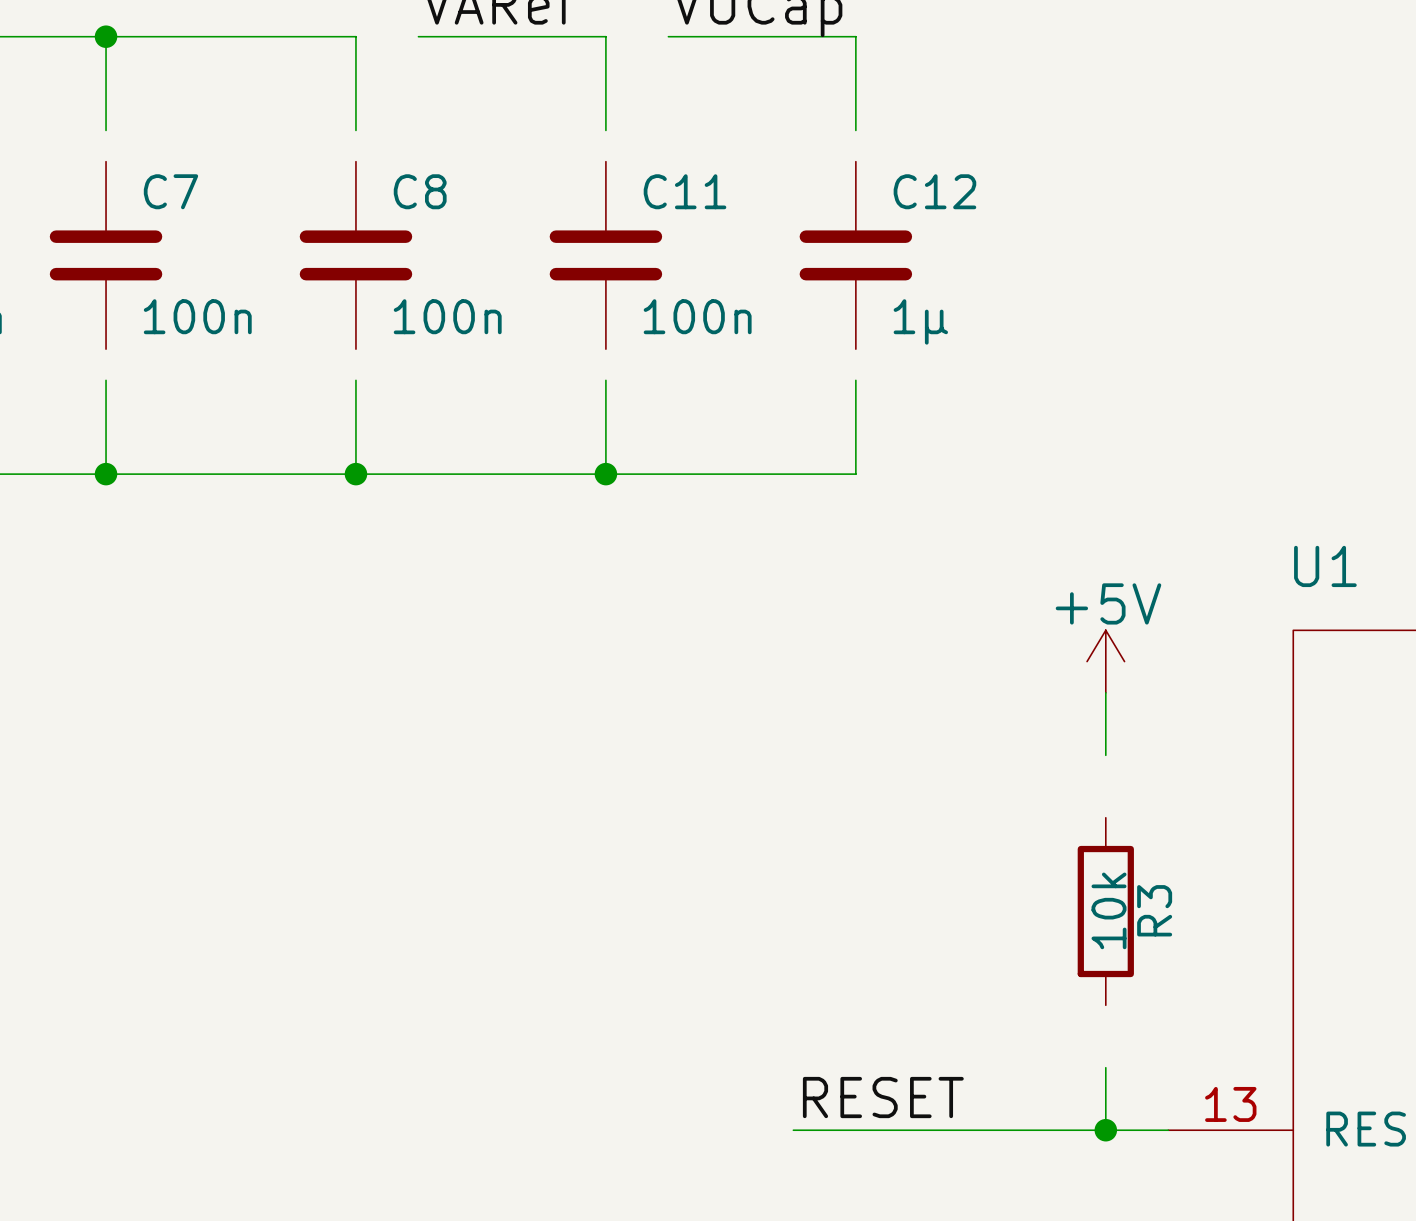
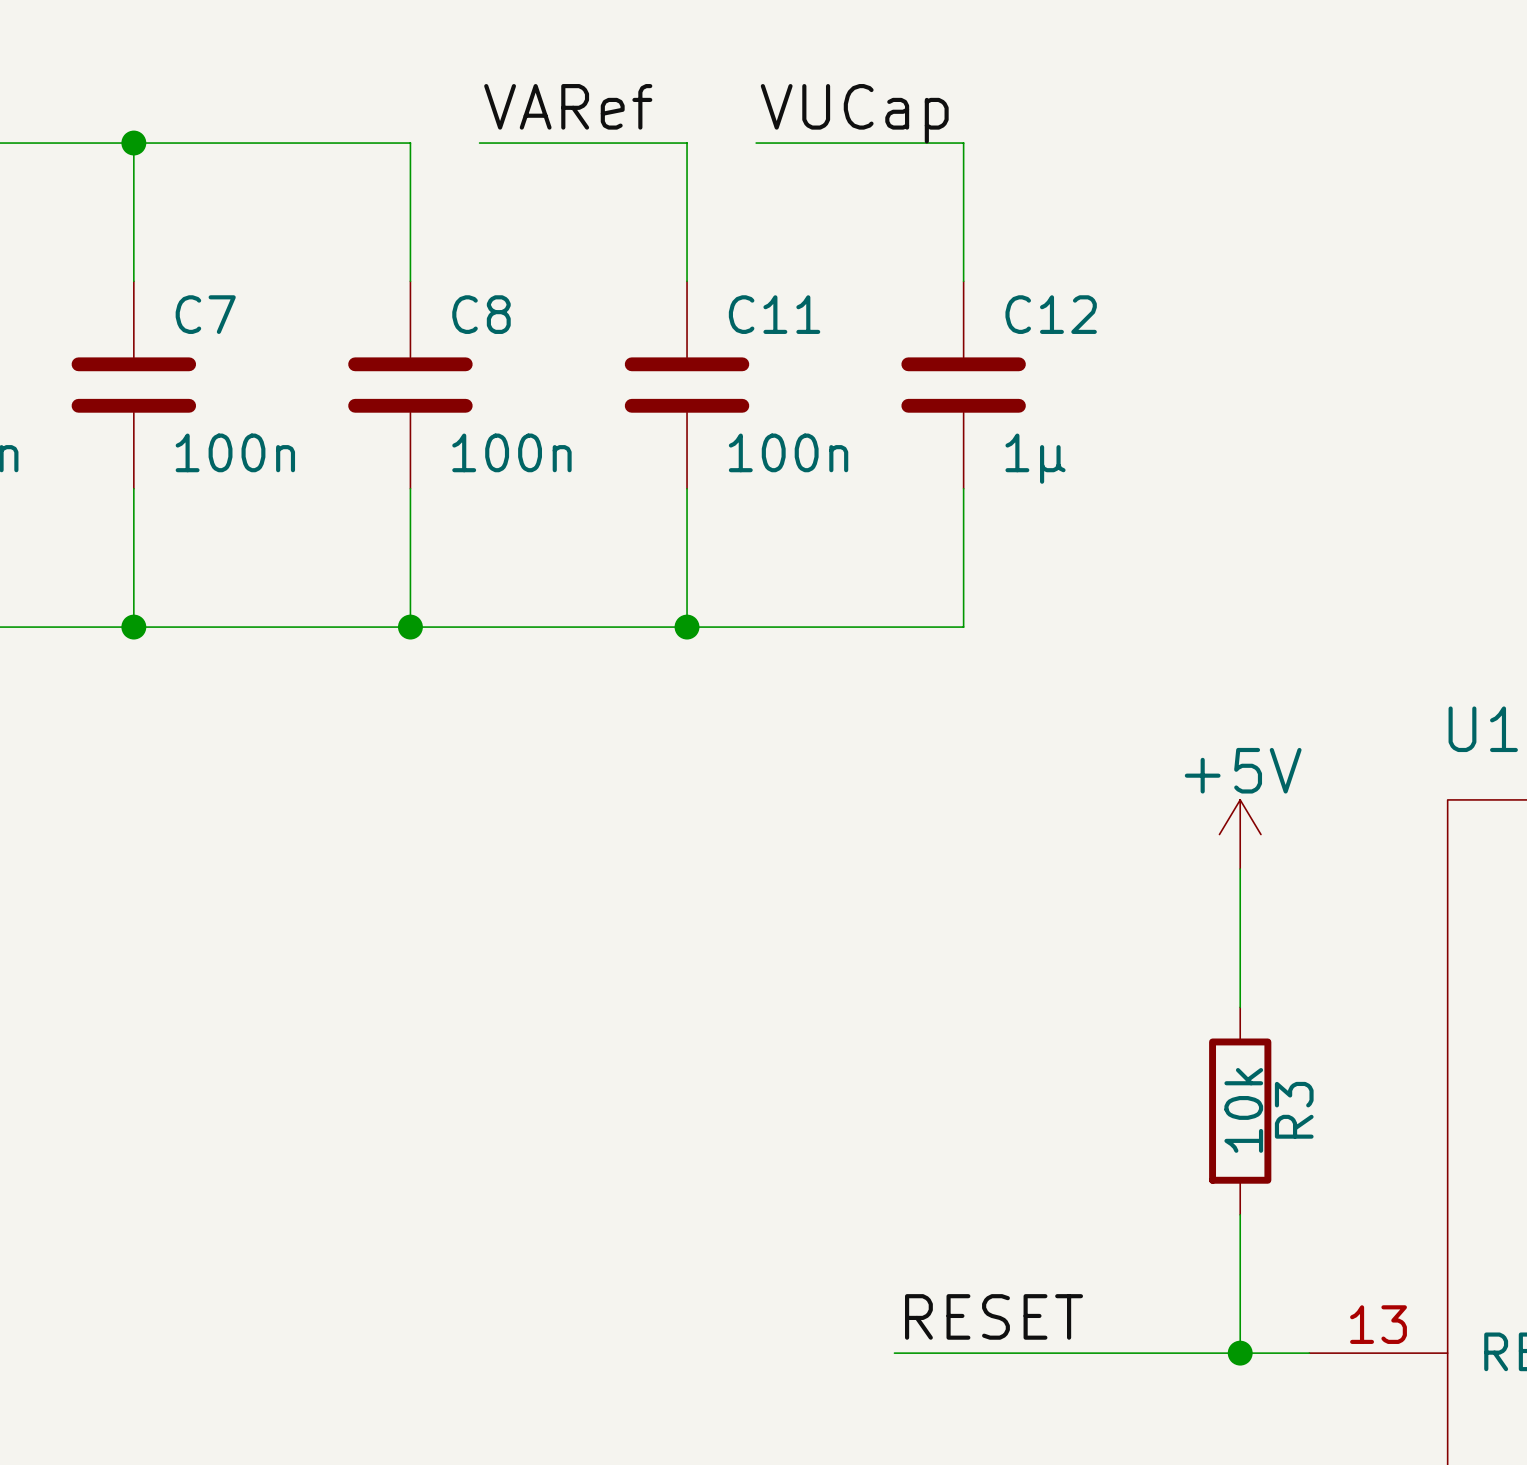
wire: none -> (133, 246) (133, 281)
wire: none -> (410, 246) (410, 281)
wire: none -> (687, 246) (687, 281)
wire: none -> (963, 246) (963, 281)
wire: none -> (133, 488) (133, 523)
wire: none -> (410, 488) (410, 523)
wire: none -> (687, 488) (687, 523)
wire: none -> (963, 488) (963, 523)
wire: none -> (1240, 938) (1240, 1007)
wire: none -> (1240, 1214) (1240, 1283)

